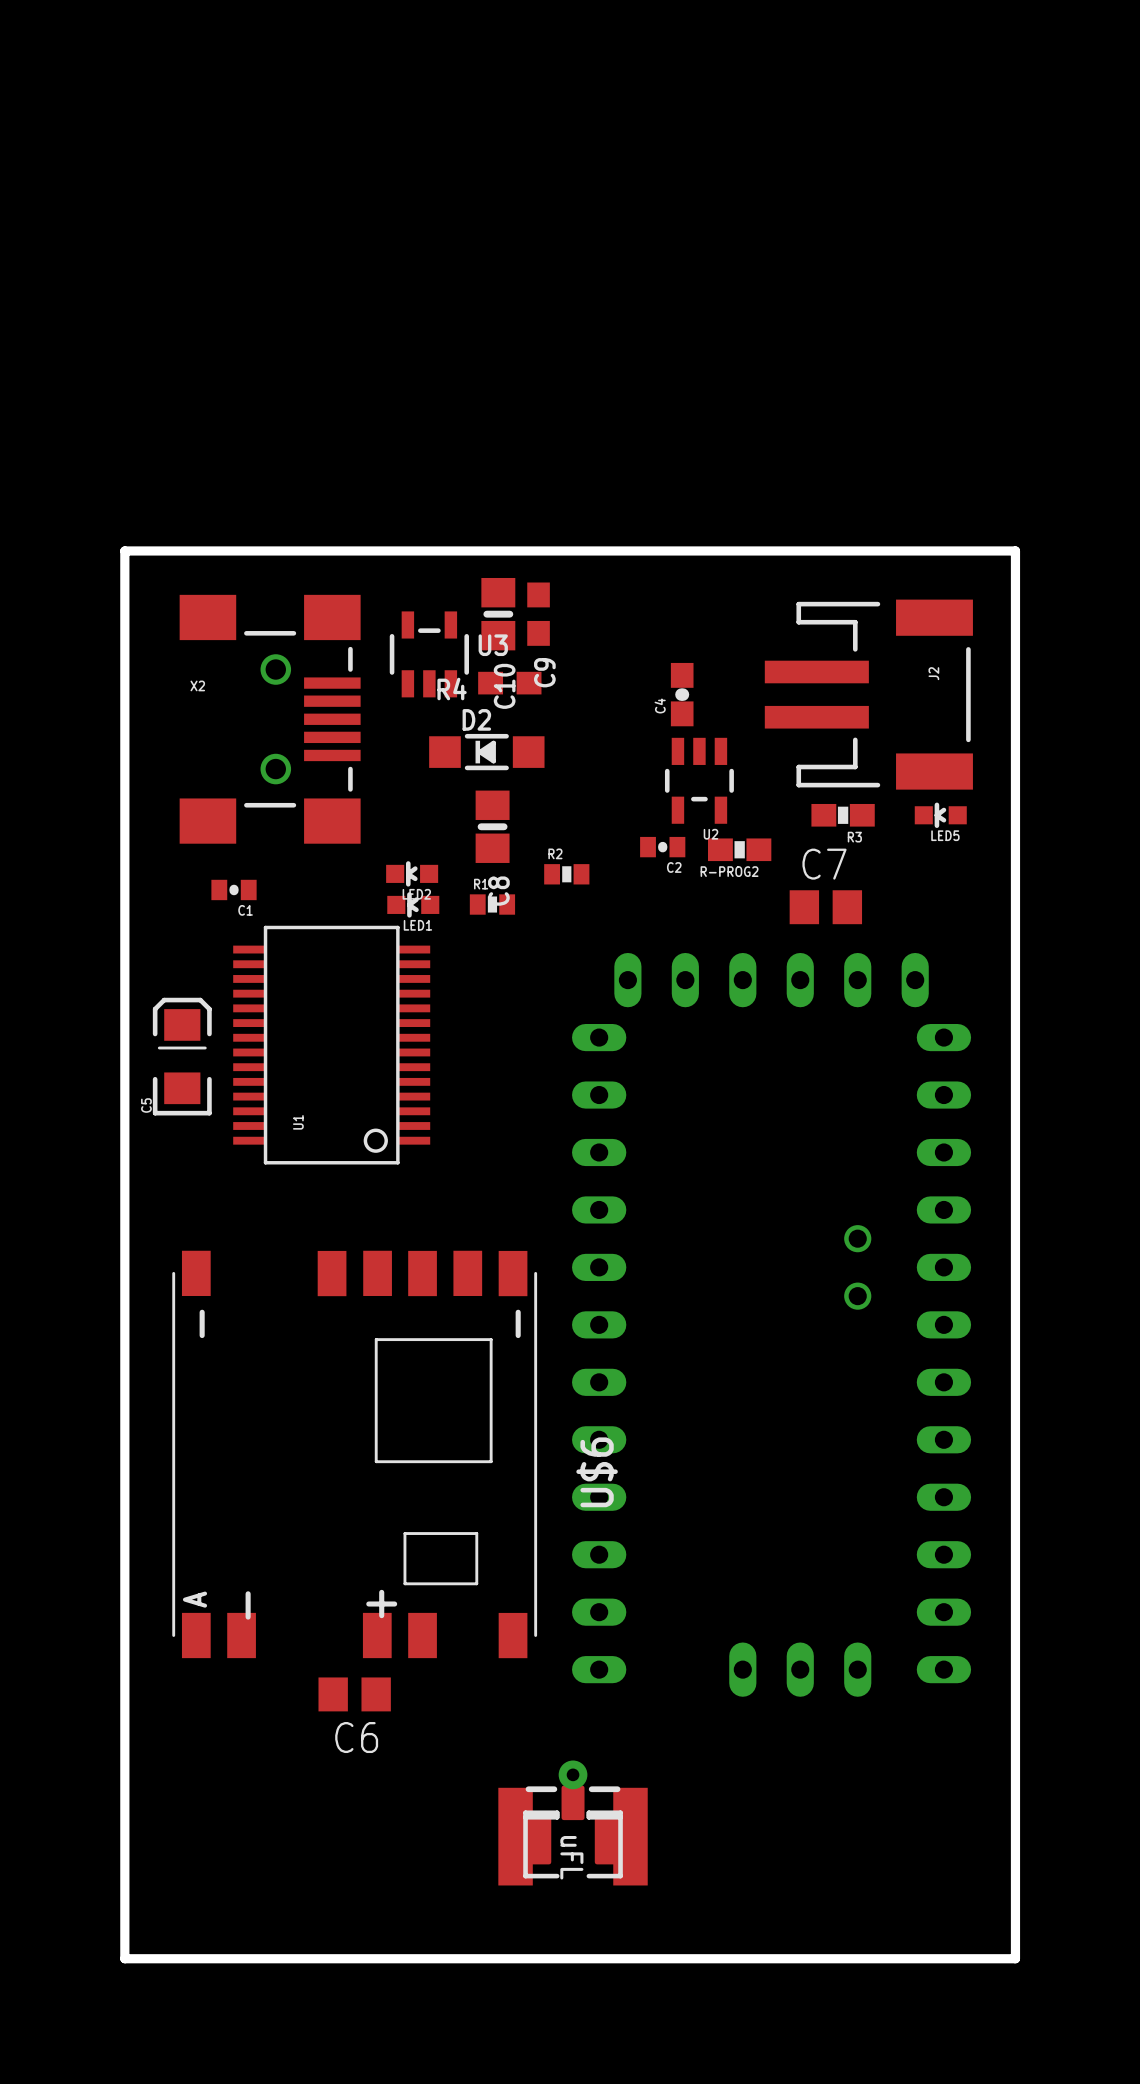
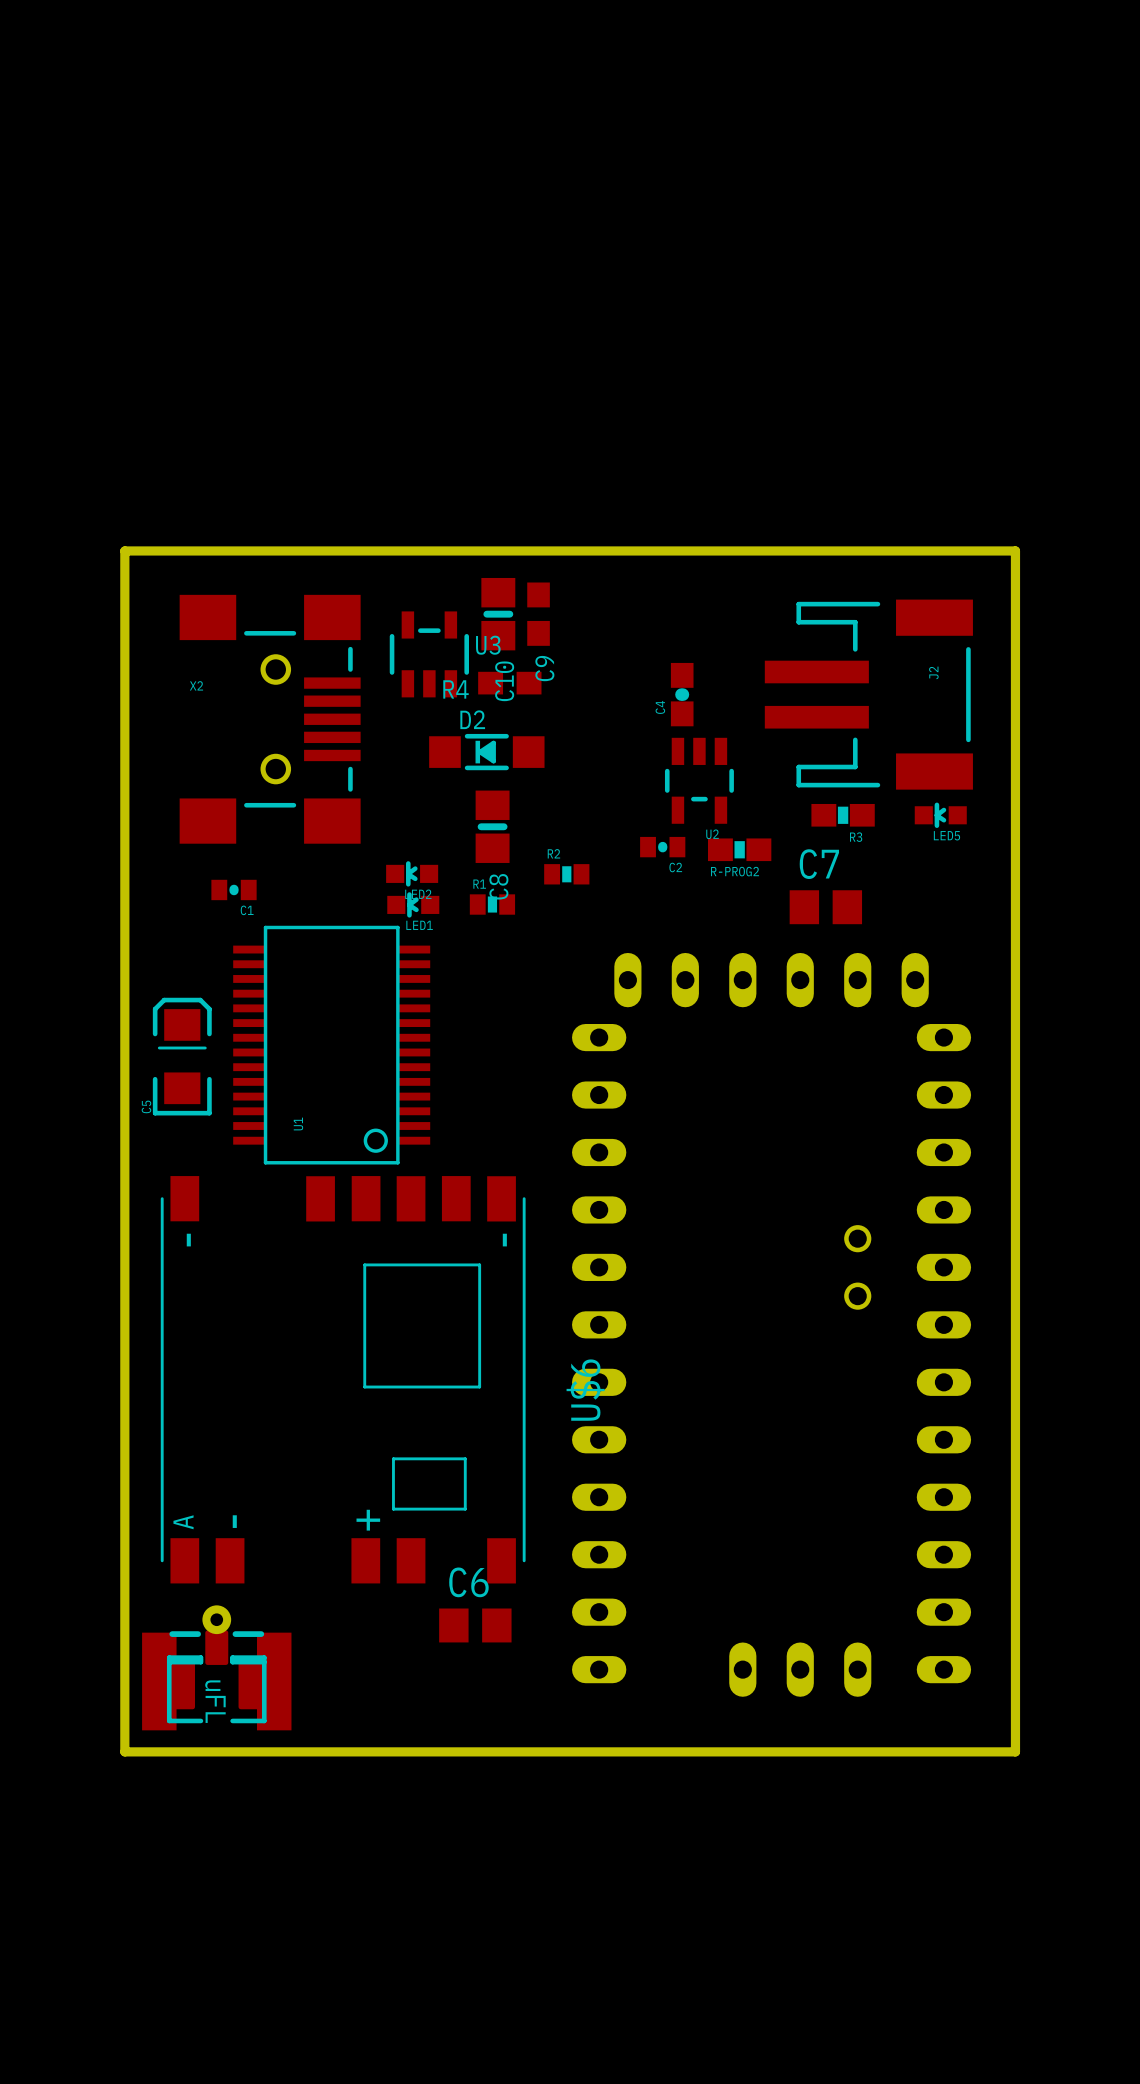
U$6 position: (354, 1454) -> (343, 1379)
C6 position: (354, 1694) -> (475, 1625)
C6 name position: C6 (356, 1737) -> C6 (468, 1582)
board edge: (124, 1751) (124, 1958) (1015, 1958) (1015, 1751) -> (124, 1751) (1015, 1751)
part position: (573, 1822) -> (216, 1667)

